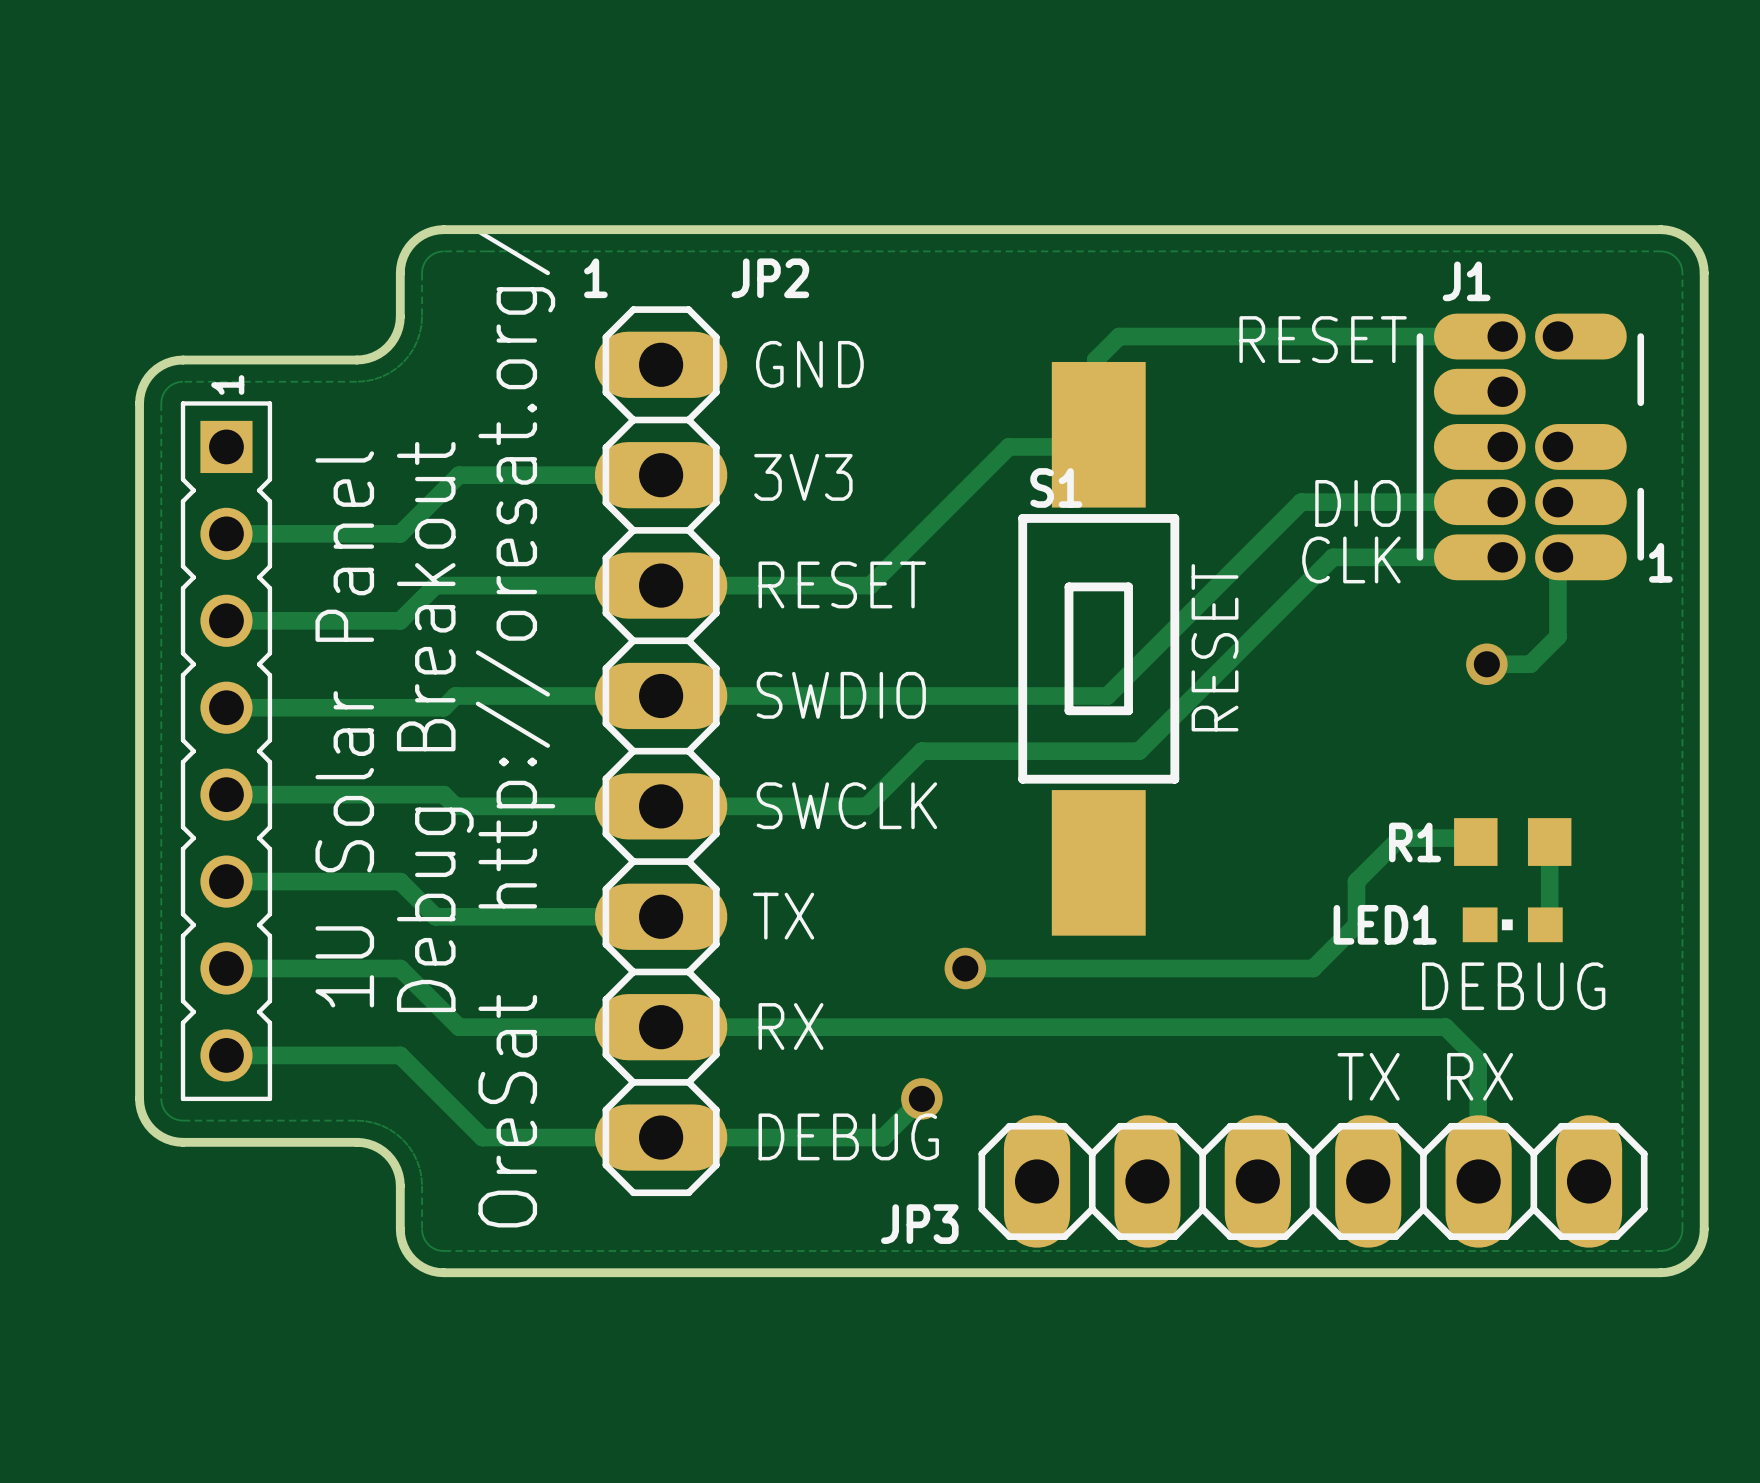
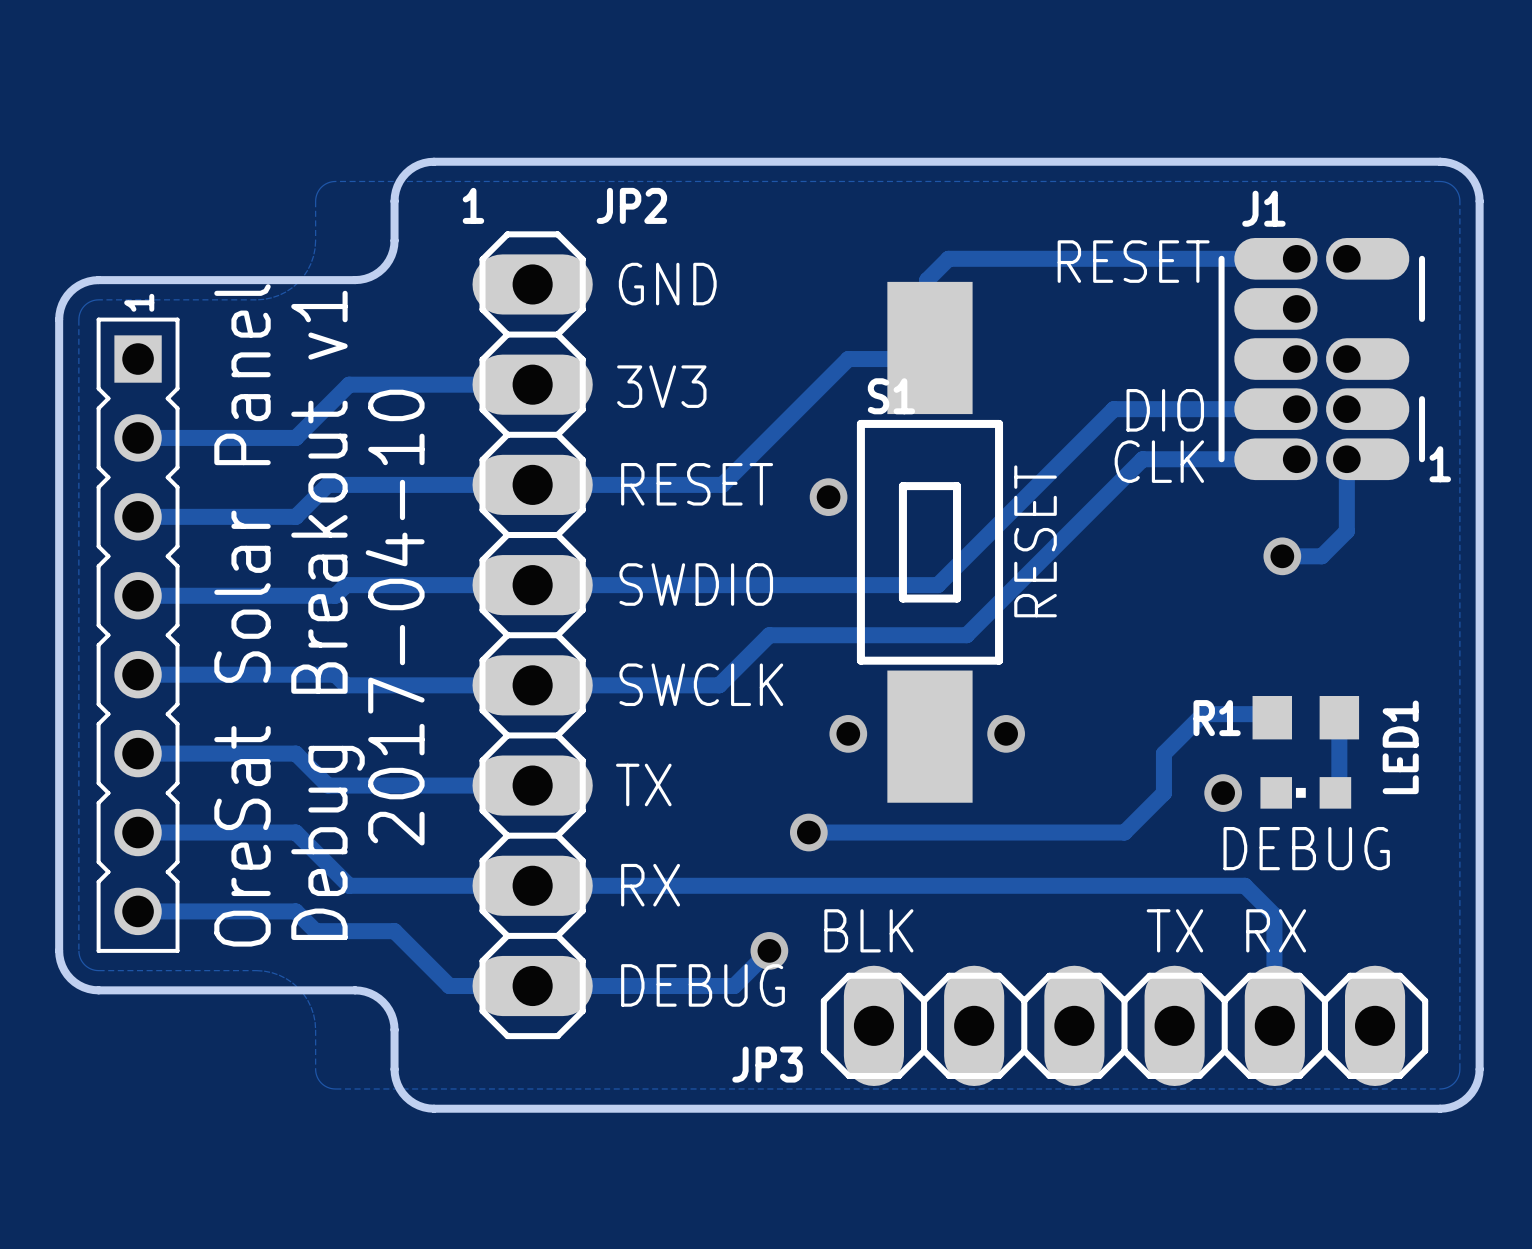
board edge: (552, 229) (443, 229) (422, 235) (409, 246) (401, 261) (399, 322) (394, 338) (378, 354) (356, 360) -> (433, 161) (414, 167) (399, 181) (394, 196) (393, 250) (386, 264) (374, 274) (355, 280) (256, 280)
via: none -> (828, 497)
text: Debug Breakout (435, 727) -> Debug Breakout v1 (327, 615)
text: OreSat http://oresat.org/ (515, 728) -> 2017-04-10 (395, 617)
text: 1U Solar Panel (344, 729) -> OreSat Solar Panel (242, 615)
via: none -> (848, 733)
via: none -> (1006, 733)
LED1 name rotation: 0° (1385, 924) -> 90° counterclockwise (1400, 747)
LED1 name position: LED1 (1385, 924) -> LED1 (1400, 747)
via: none -> (1223, 793)
text: none -> BLK (868, 930)
track: (422, 1077) (482, 1137) (569, 1137) -> (315, 931) (394, 931) (449, 986)
board edge: (356, 1142) (378, 1148) (394, 1164) (399, 1180) (401, 1240) (409, 1255) (422, 1266) (443, 1272) (552, 1272) -> (256, 990) (355, 990) (374, 995) (386, 1005) (393, 1019) (394, 1074) (399, 1088) (414, 1103) (433, 1108)

